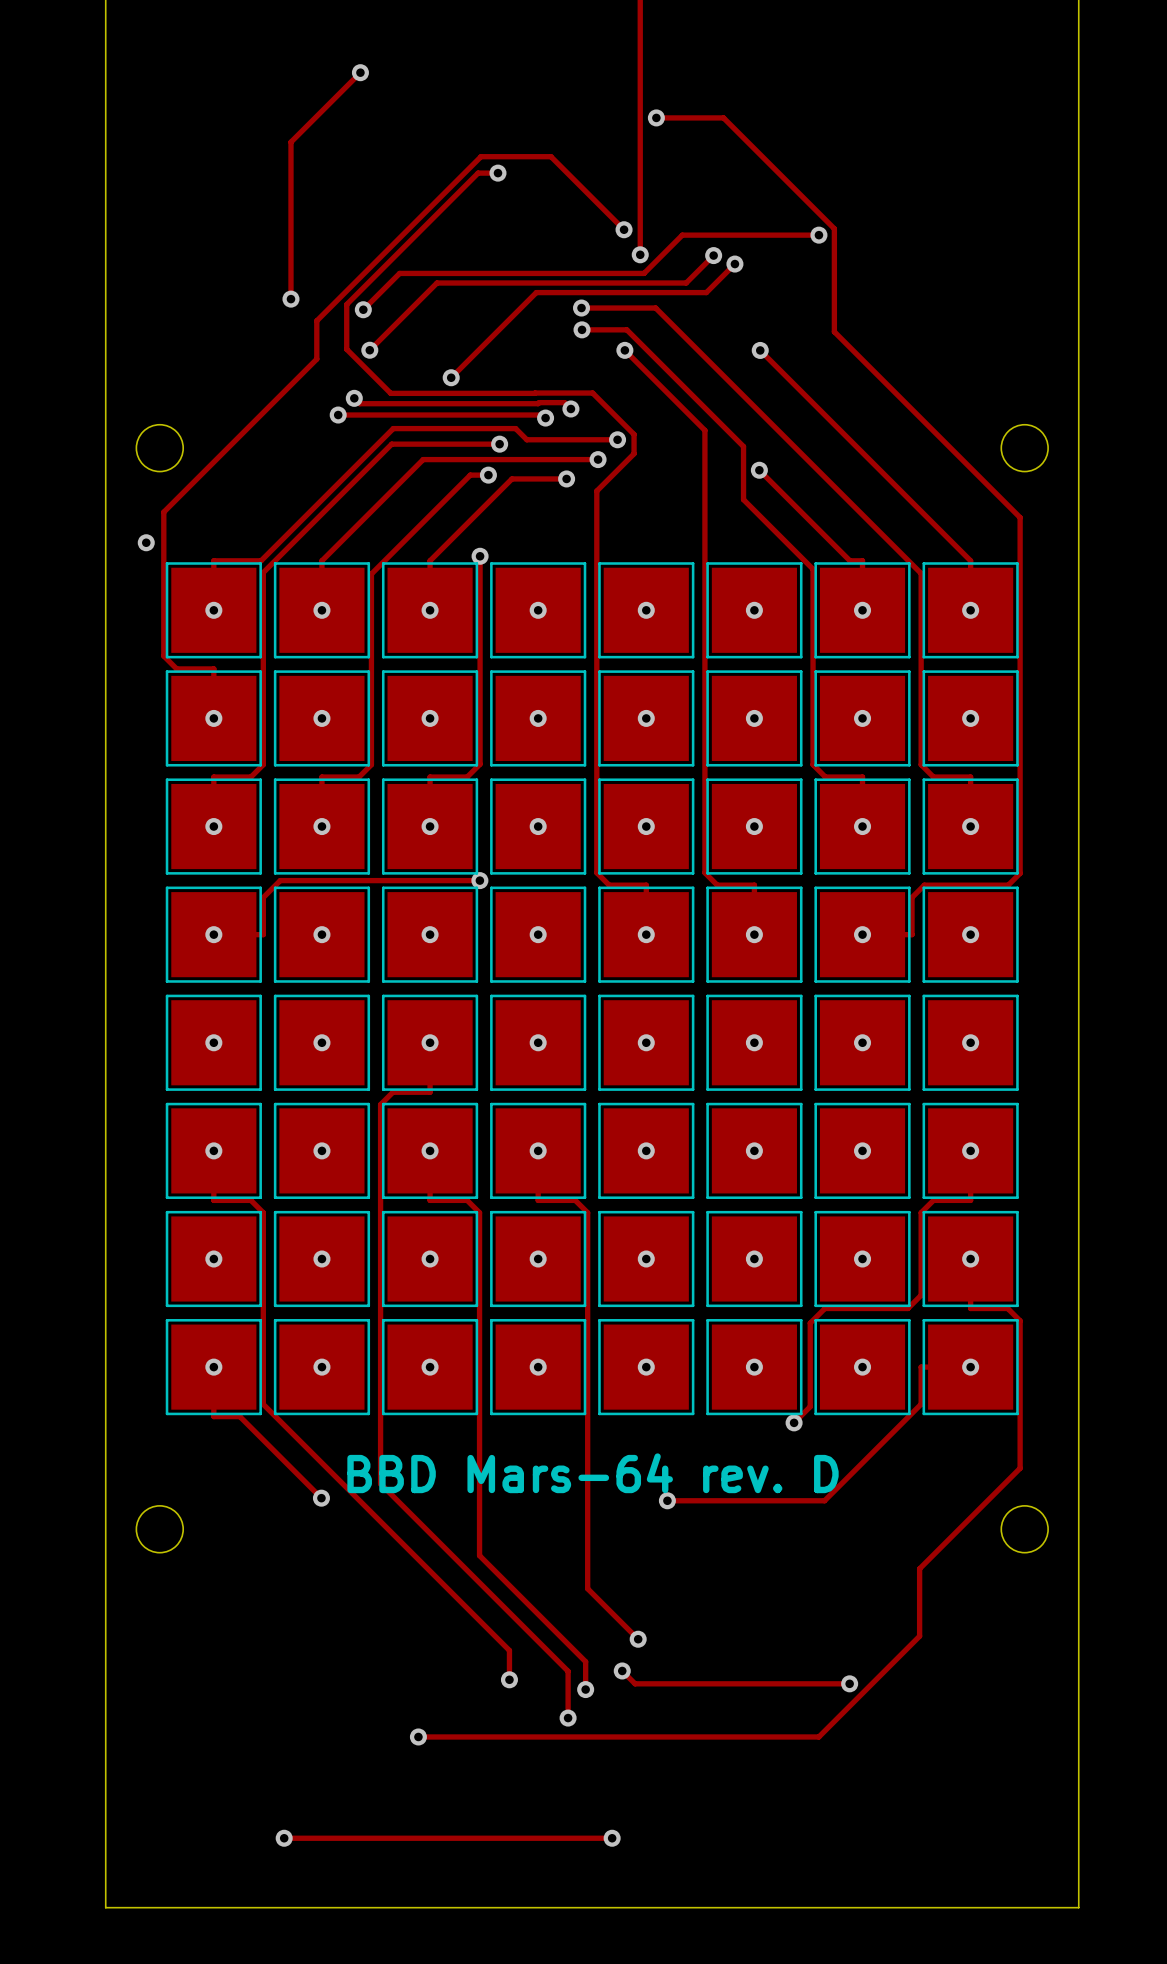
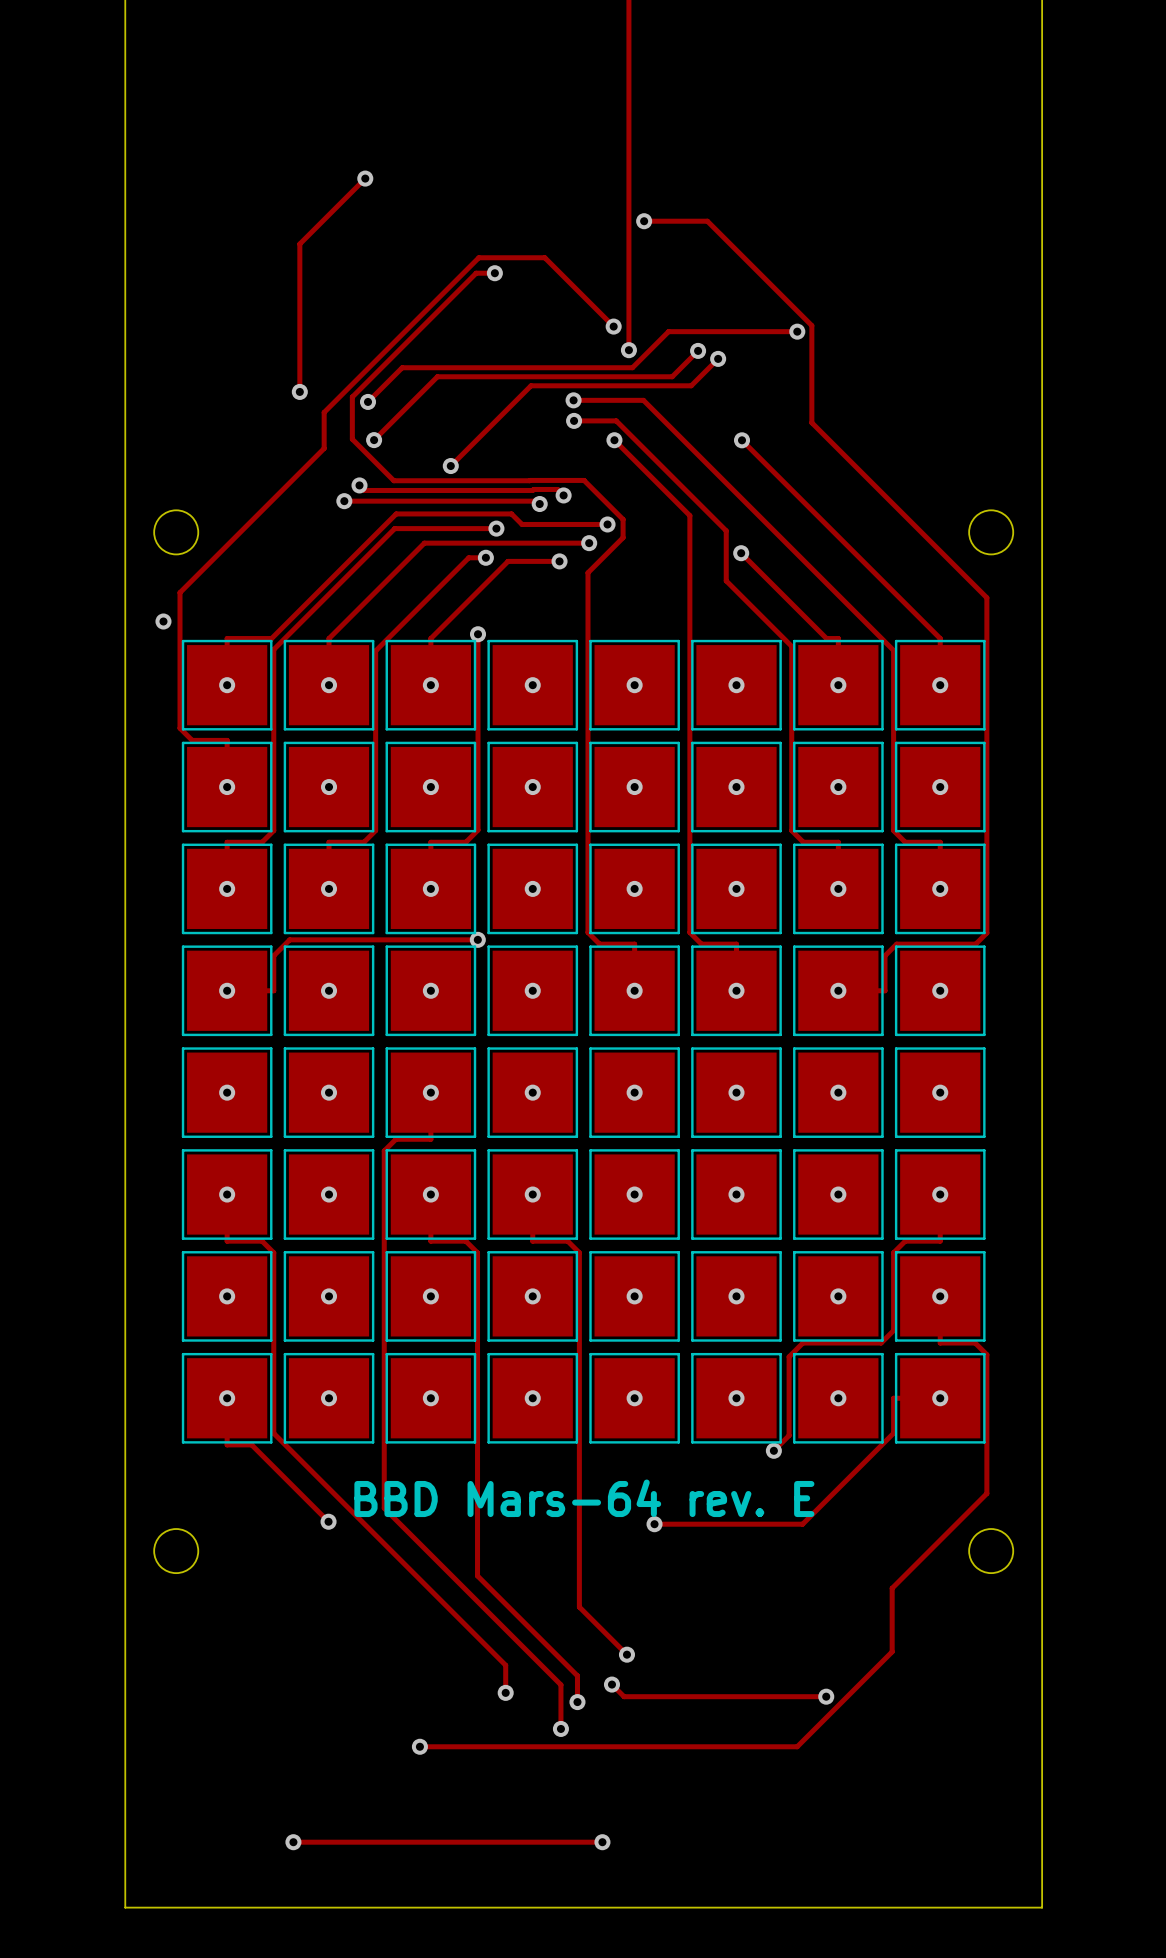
text: BBD Mars-64 rev. D (593, 1473) -> BBD Mars-64 rev. E (584, 1498)

